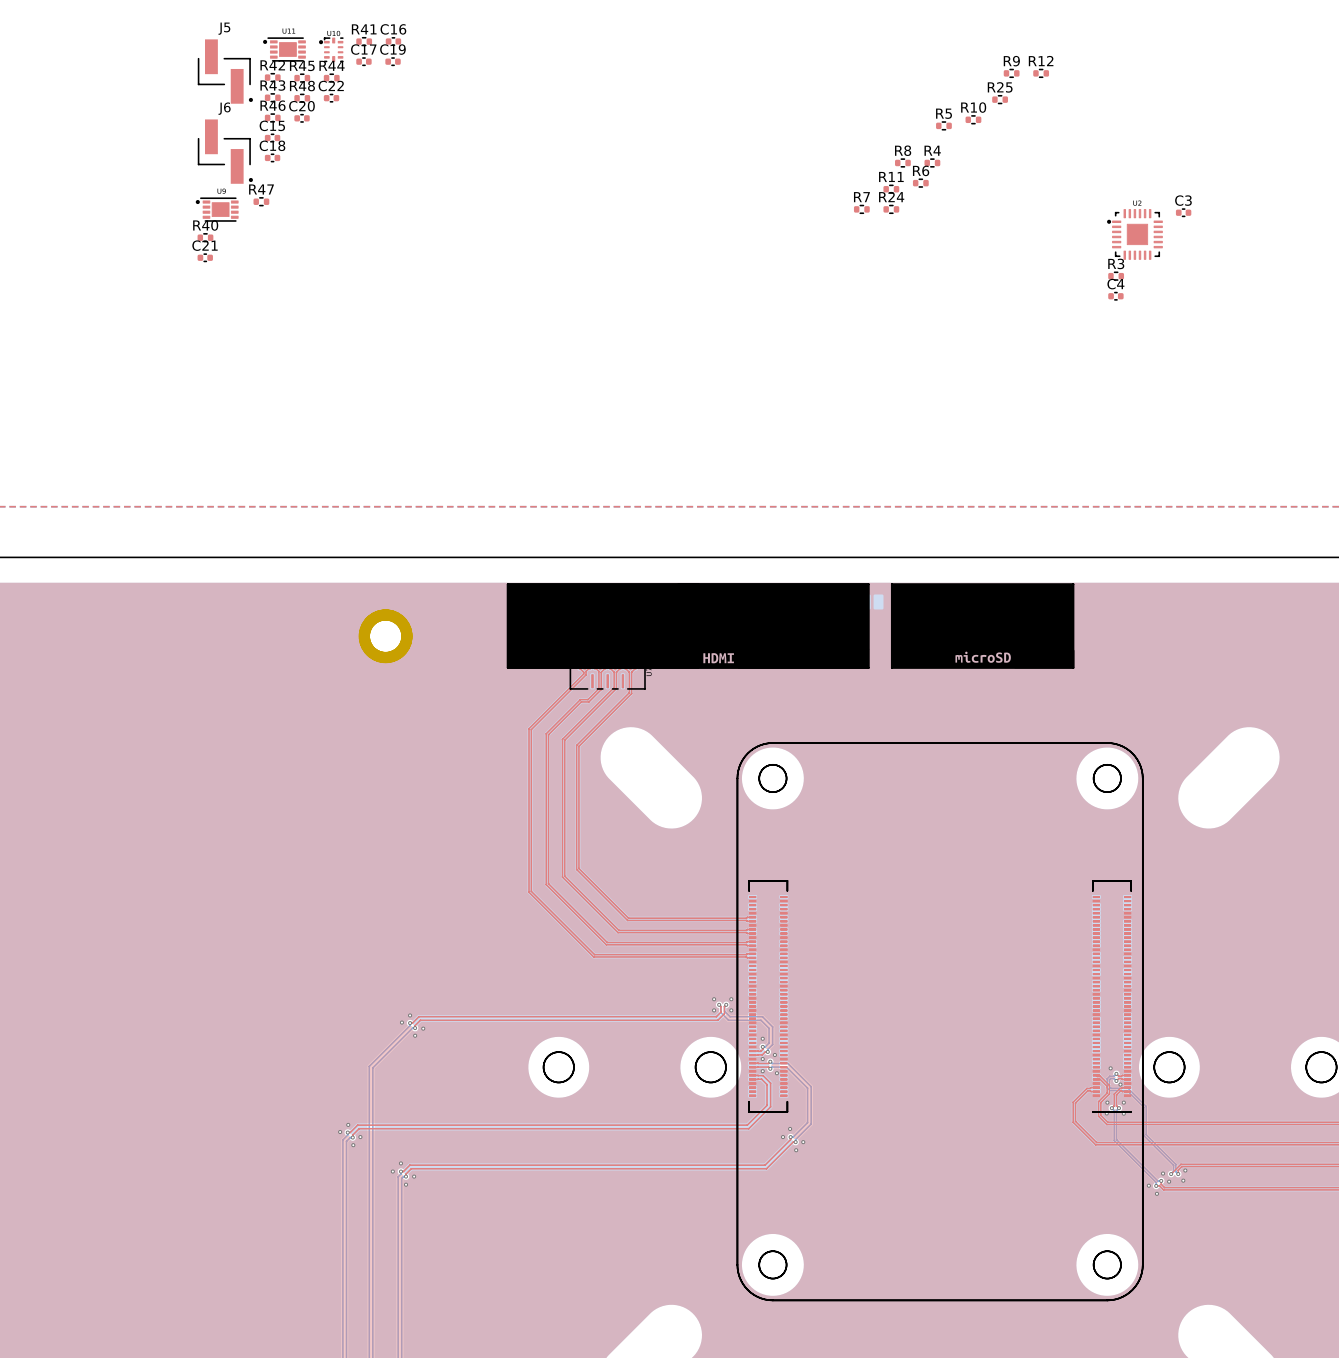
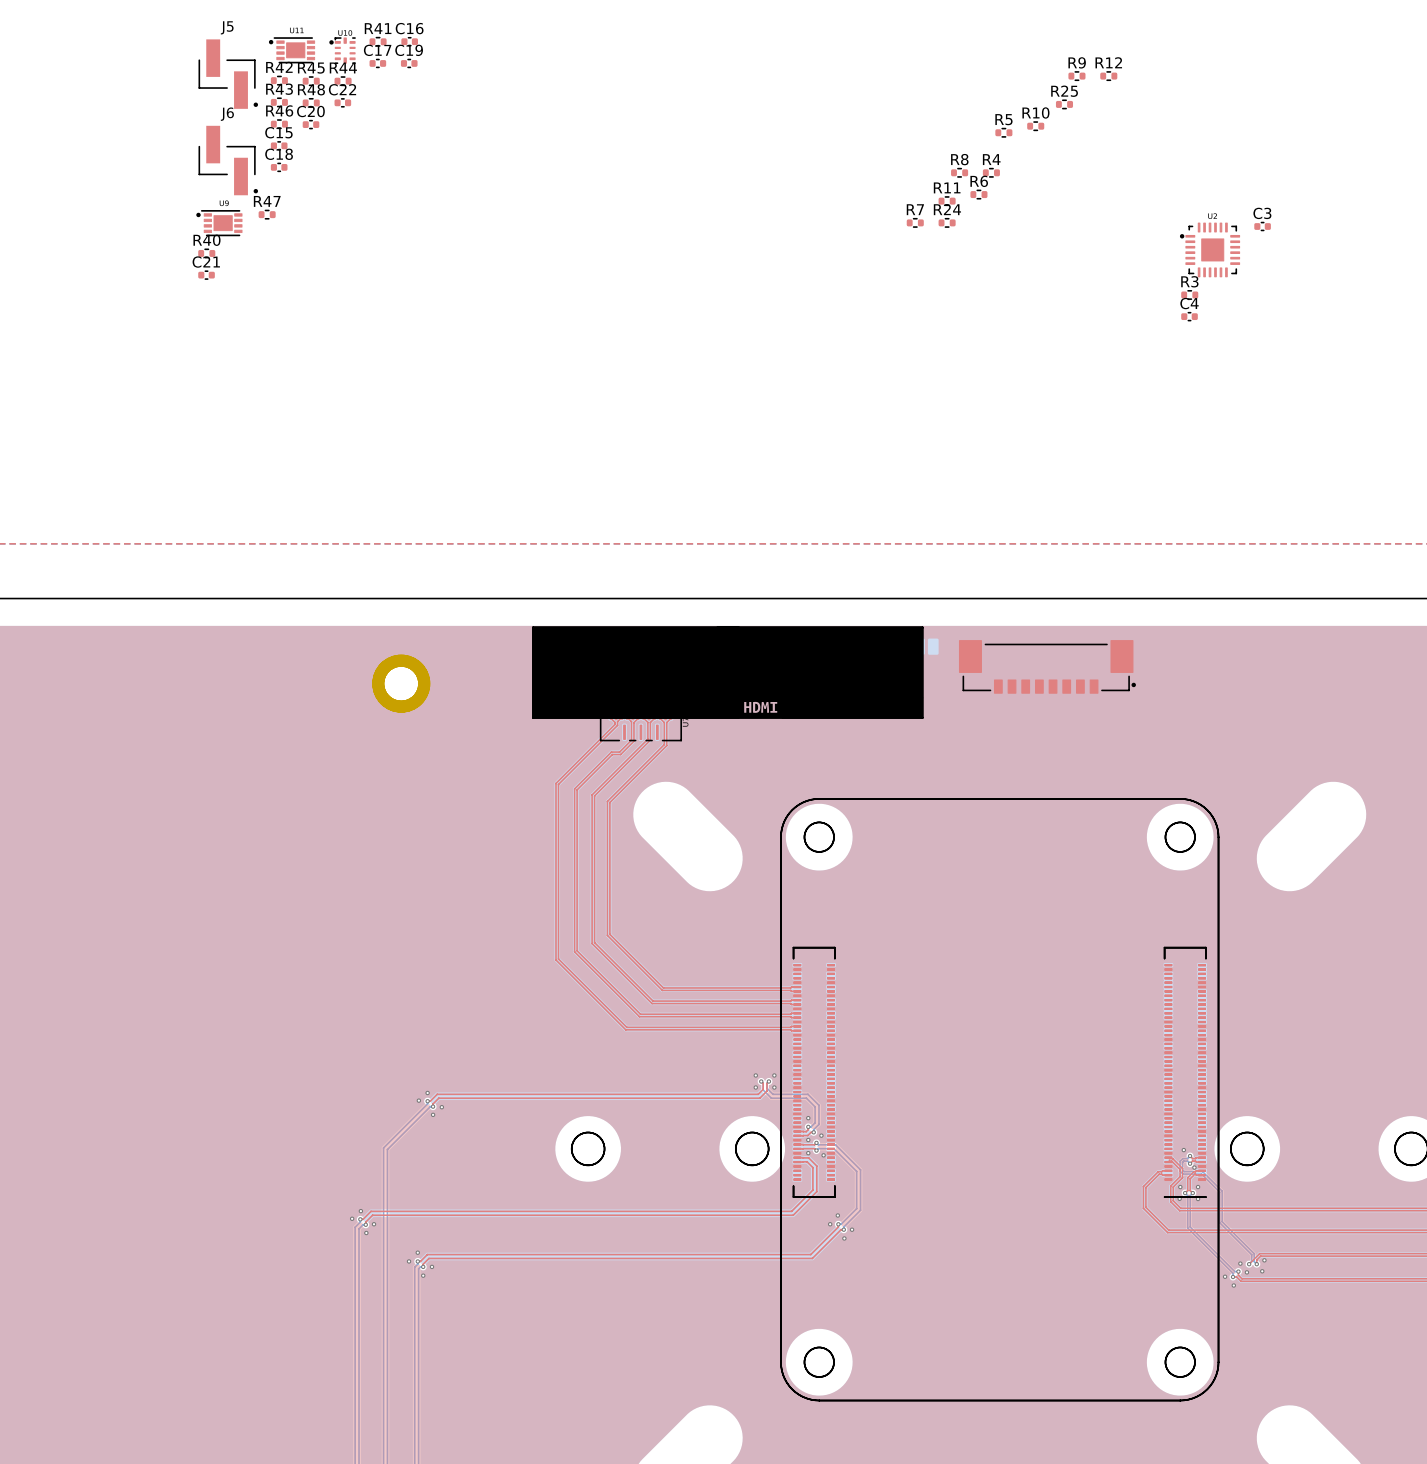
line: (891, 584) (1073, 584) (1073, 667) (891, 667) (891, 584) -> none
drawing: [891, 584, 1075, 669] -> none

